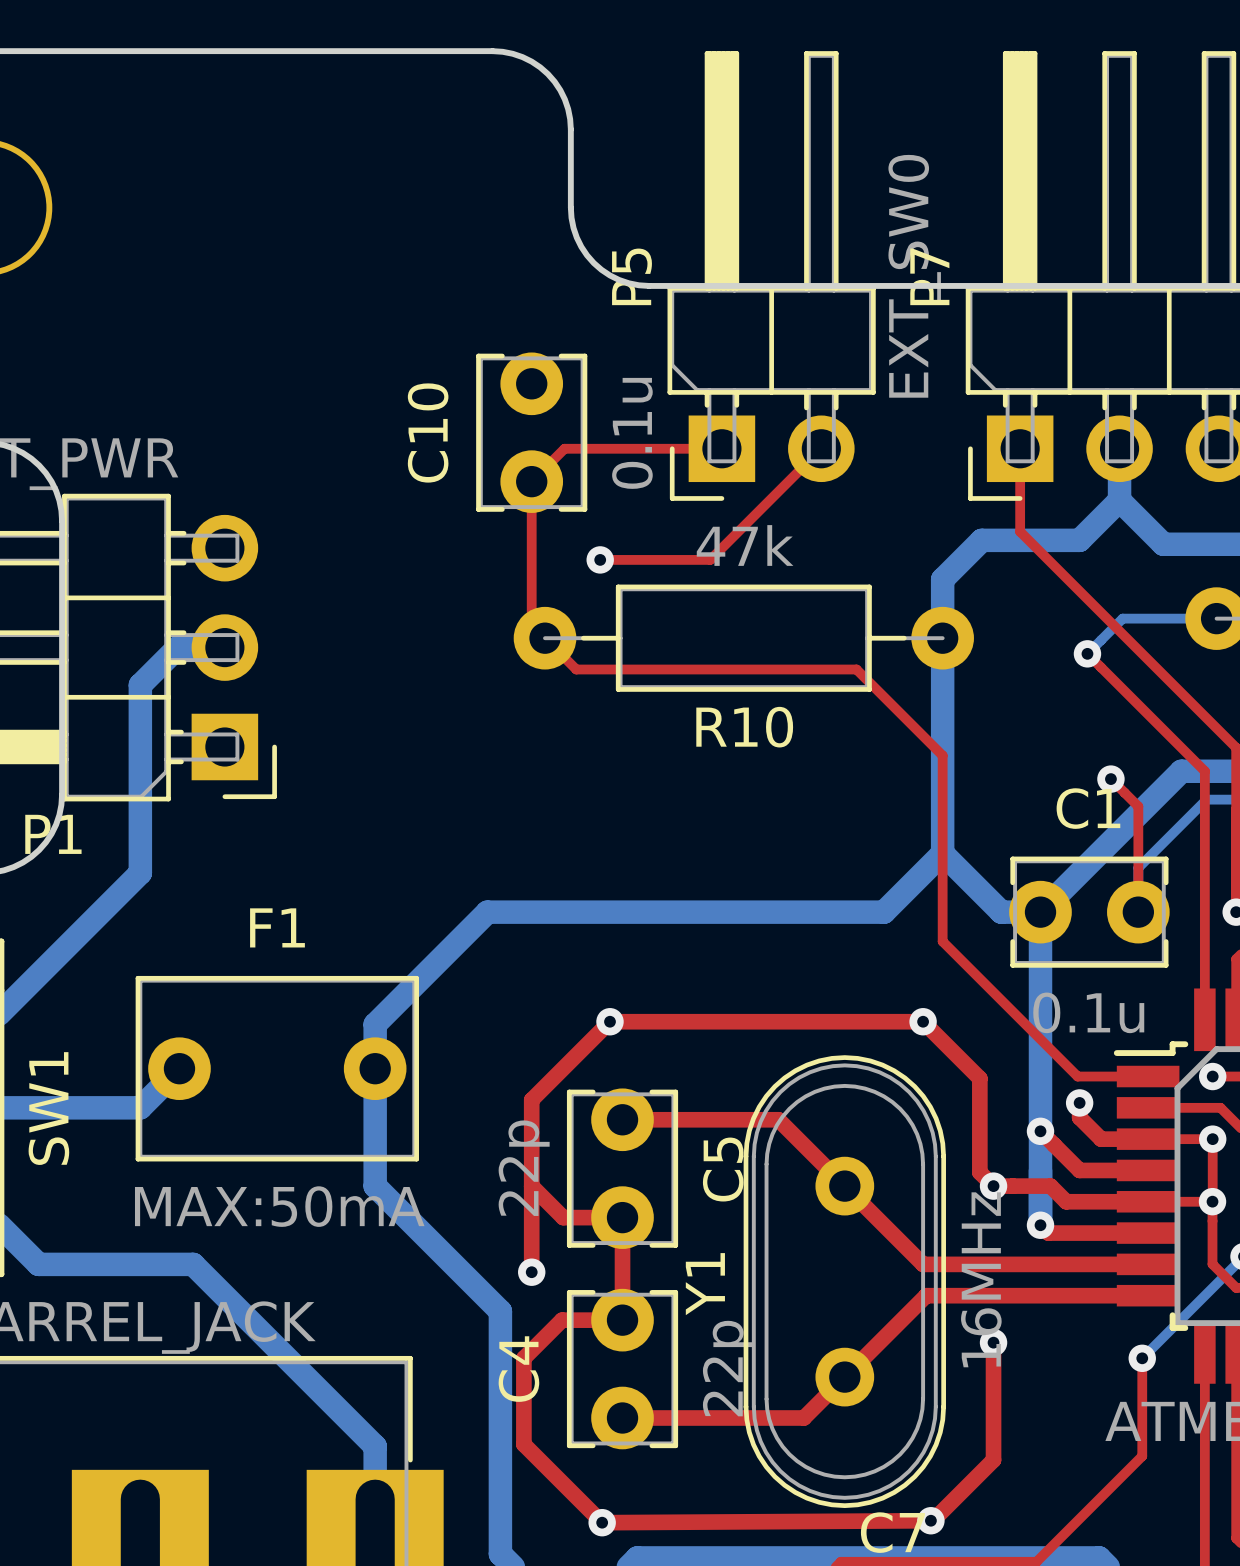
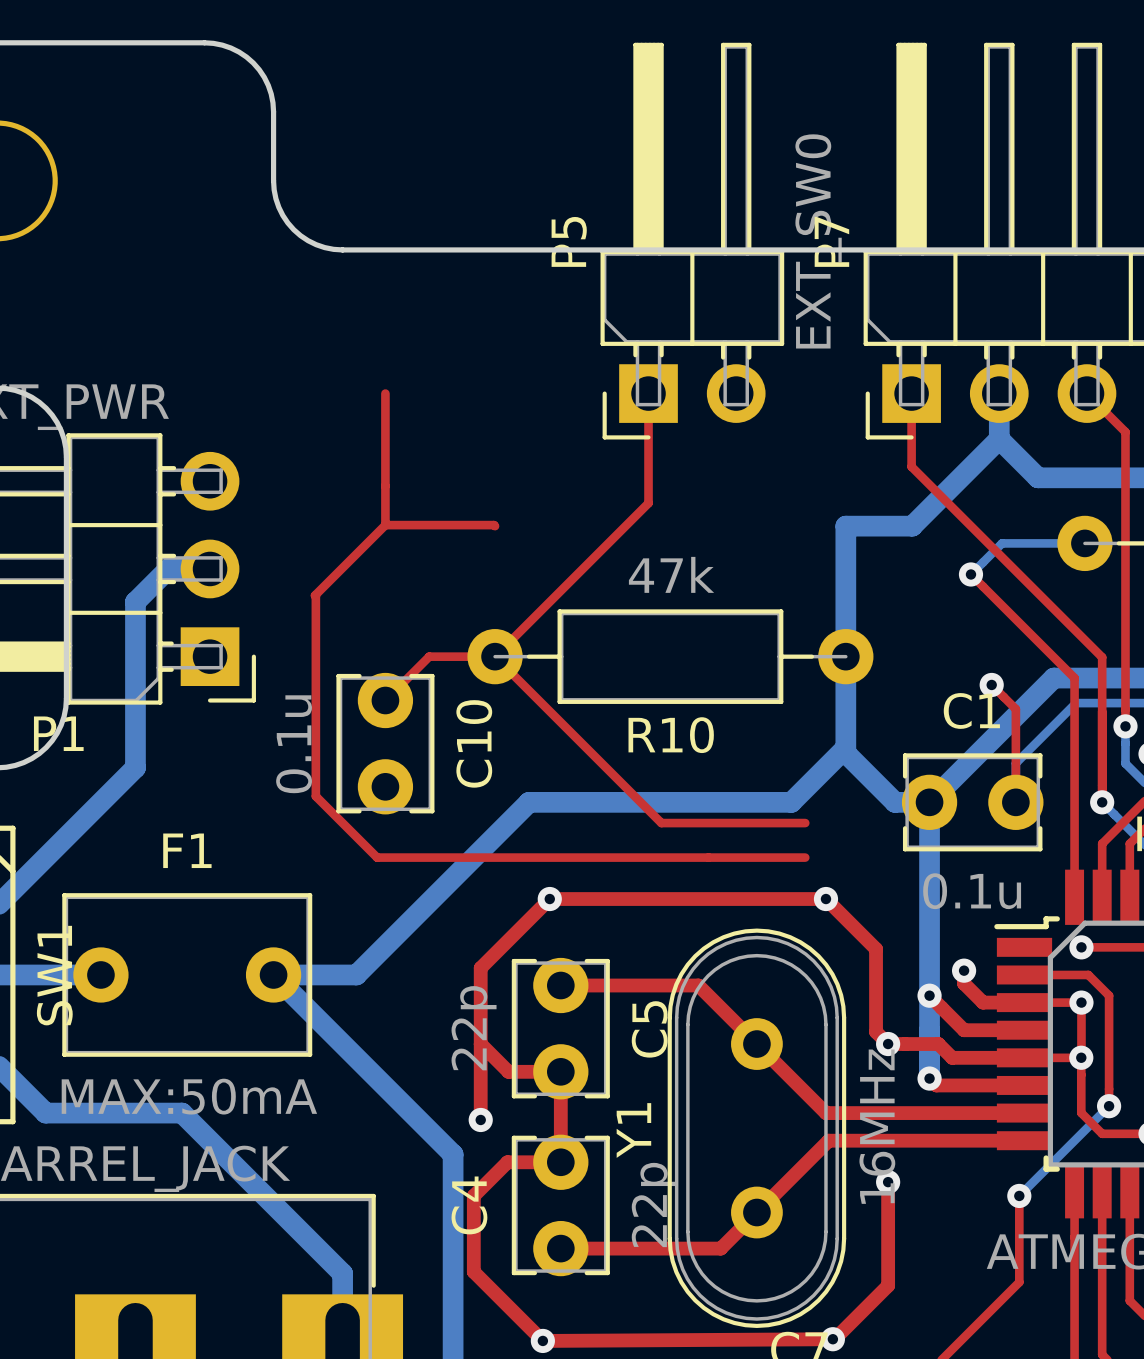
board edge: (218, 51) (492, 51) (512, 53) (531, 61) (554, 81) (568, 109) (570, 129) (571, 217) (581, 246) (593, 263) (609, 275) (628, 283) (649, 285) -> (204, 42) (222, 45) (239, 52) (253, 63) (264, 77) (272, 102) (273, 180) (275, 198) (287, 222) (308, 240) (324, 247) (342, 249) (584, 249)
C10 name position: C10 (428, 432) -> C10 (474, 743)
C10 position: (531, 432) -> (385, 743)
C10 value position: 0.1u (632, 433) -> 0.1u (294, 744)
top track: none -> (385, 393) (385, 525)
top track: (721, 448) (564, 448) (531, 481) (531, 624) (576, 669) (856, 669) (942, 755) (942, 941) (1077, 1076) (1148, 1076) -> (648, 393) (648, 503) (495, 656)
top track: (821, 448) (710, 559) (600, 559) -> none
bottom track: (1079, 540) (981, 540) (942, 579) (942, 853) (945, 856) -> (964, 474) (912, 526) (845, 526) (845, 753)
via: (600, 559) -> none
top track: none -> (385, 525) (315, 595) (315, 796) (377, 857) (805, 857)
top track: none -> (385, 525) (495, 526)
R10 position: (743, 638) -> (670, 656)
top track: none -> (495, 656) (661, 823) (805, 823)
top track: none -> (495, 656) (429, 656) (385, 700)
bottom track: (586, 912) (487, 912) (375, 1024) (375, 1186) -> (529, 802) (356, 974) (273, 974) (342, 1044)
bottom track: (179, 1068) (140, 1107) (101, 1107) -> none
F1 position: (277, 1068) -> (187, 974)

